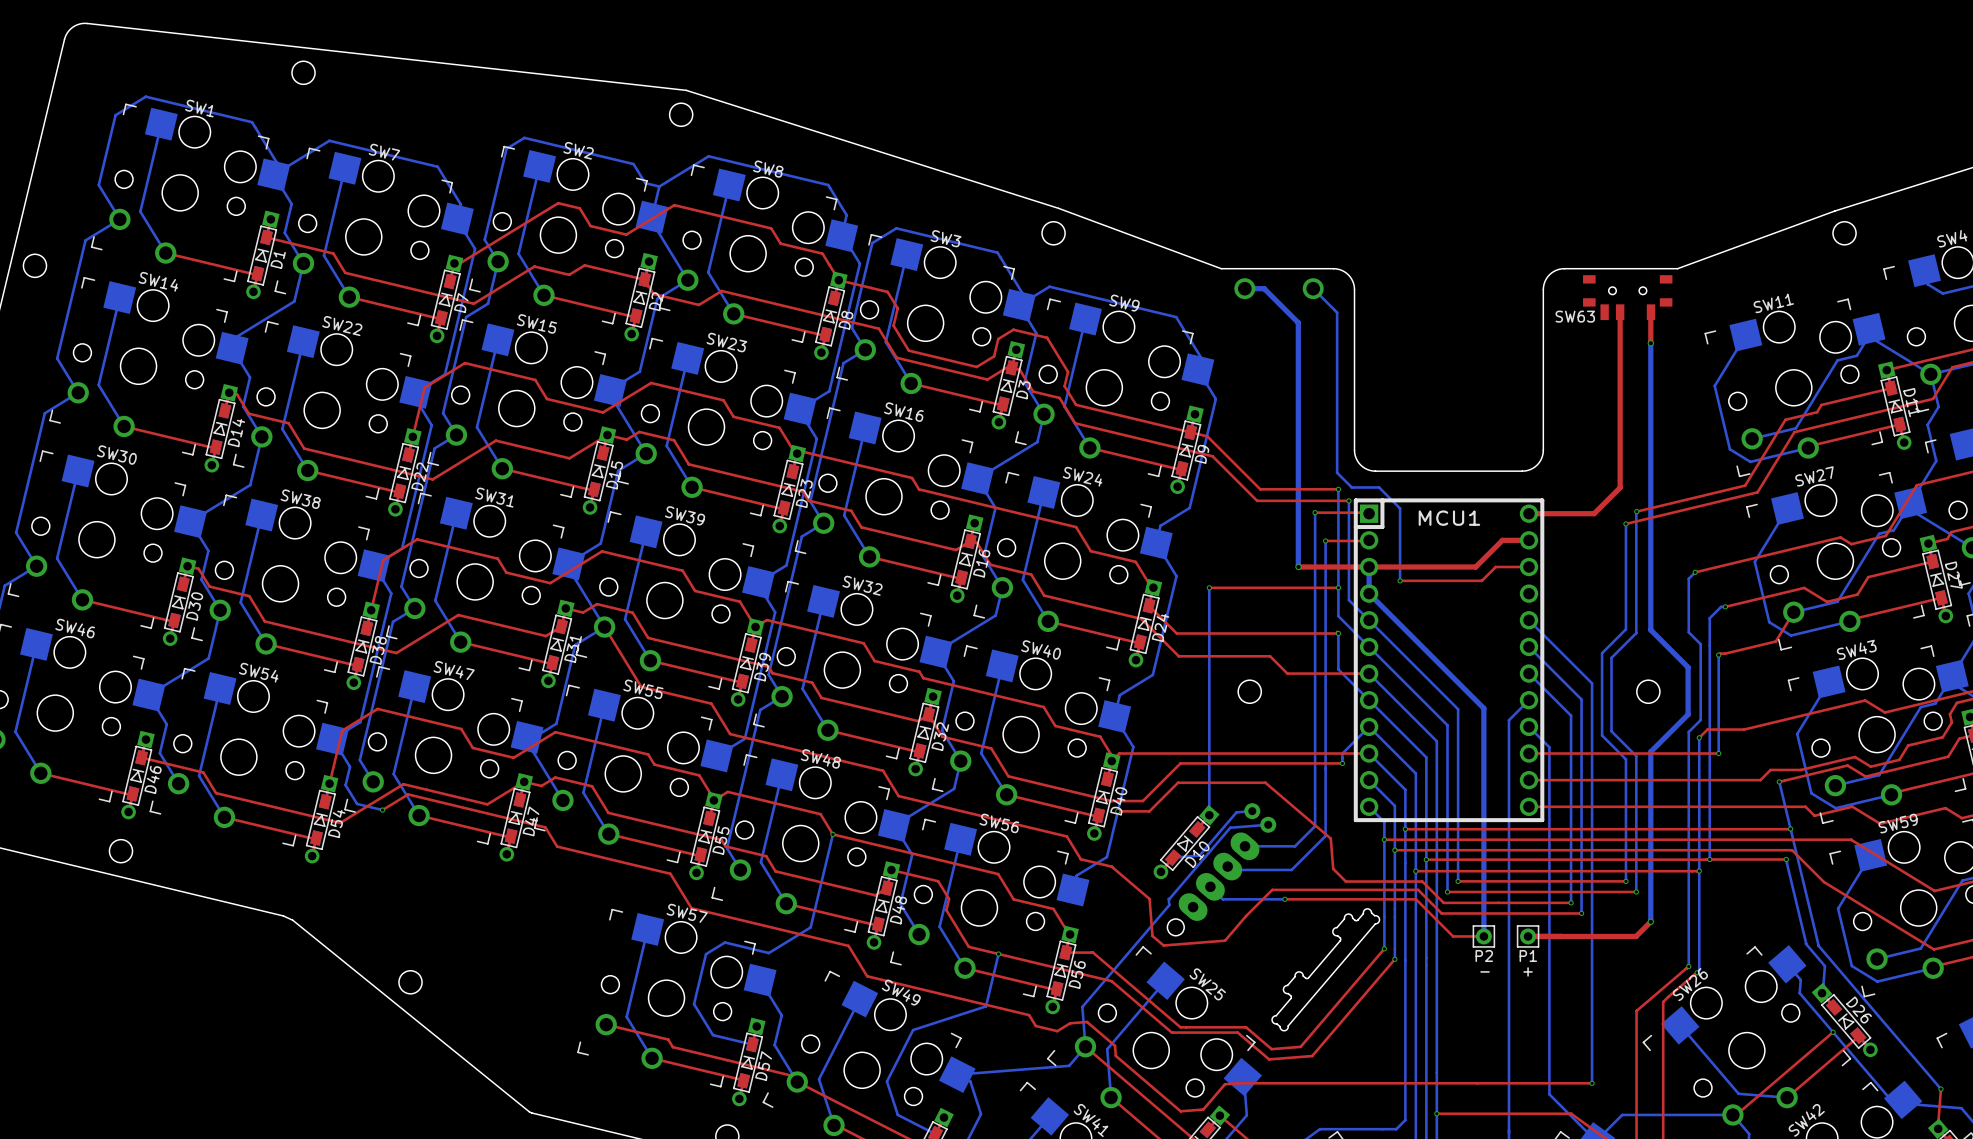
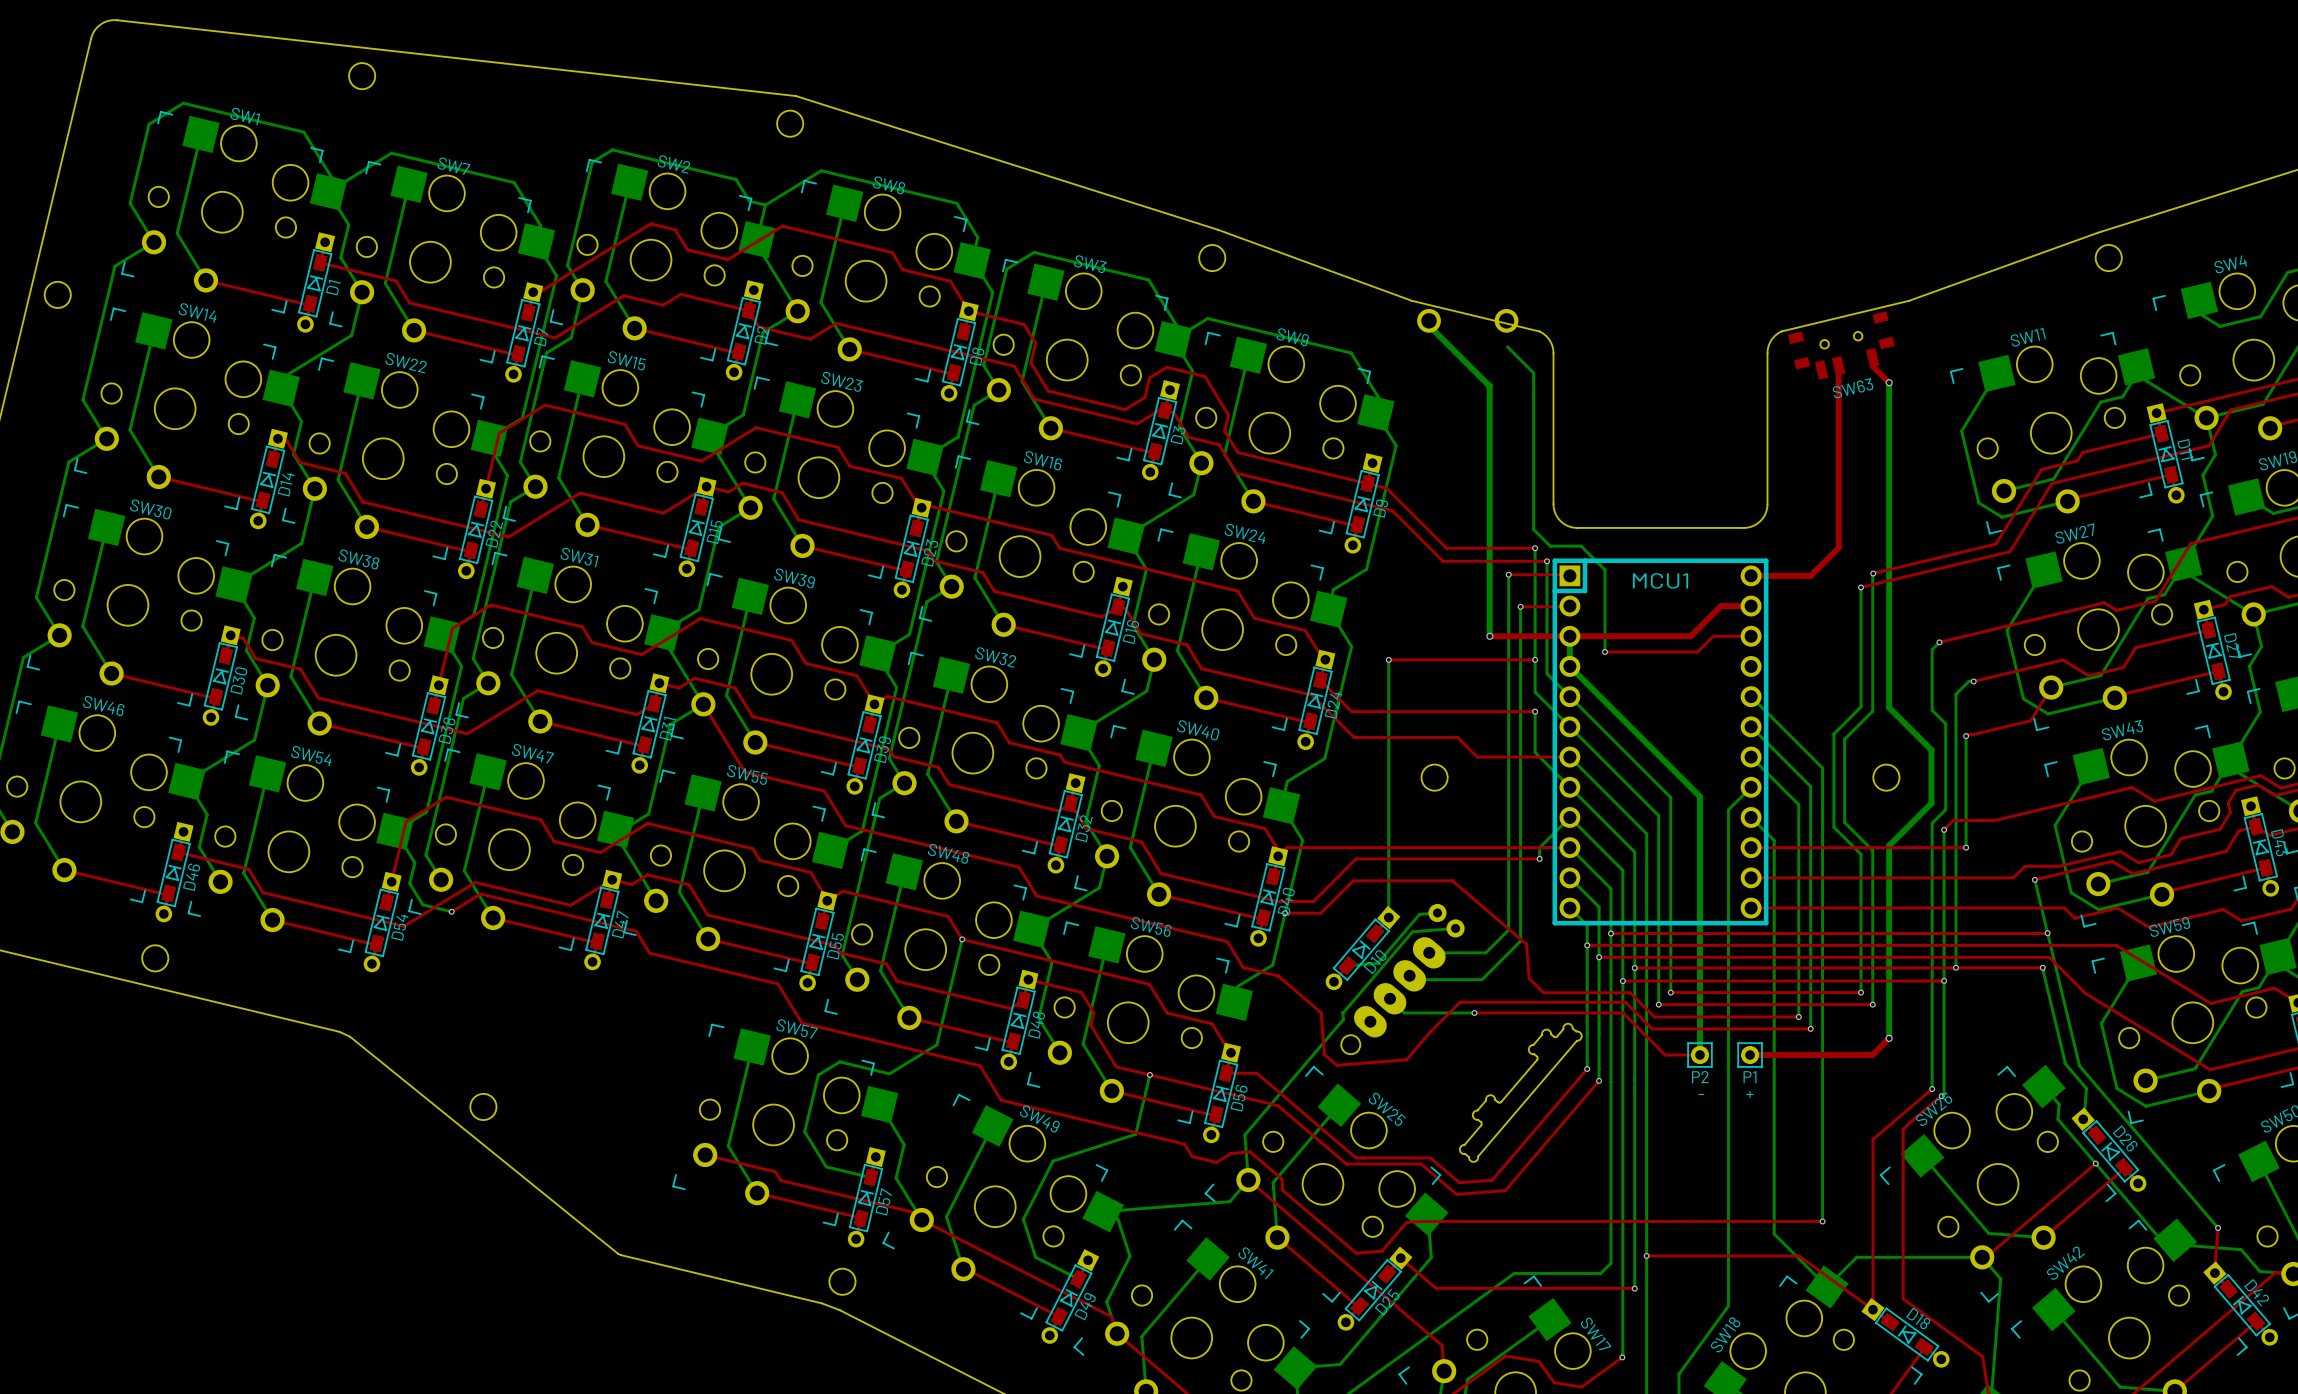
board edge: (1058, 208) (1221, 268) (1333, 268) (1346, 273) (1351, 279) (1354, 289) (1354, 452) (1357, 460) (1362, 466) (1375, 471) (1522, 471) (1530, 469) (1537, 465) (1541, 458) (1543, 450) (1543, 286) (1547, 276) (1553, 271) (1564, 268) (1677, 268) (1834, 211) -> (1218, 229) (1412, 300) (1539, 331) (1544, 334) (1551, 342) (1553, 353) (1553, 507) (1556, 516) (1562, 523) (1577, 527) (1743, 527) (1755, 524) (1762, 518) (1767, 507) (1767, 353) (1769, 342) (1776, 334) (1781, 331) (1909, 300) (2097, 232)
bottom track: (1244, 288) (1264, 288) (1298, 322) (1298, 345) -> (1432, 328) (1489, 385)
bottom track: (1313, 288) (1337, 312) (1337, 334) -> (1507, 346) (1533, 372)
SW63 rotation: 0° (1627, 297) -> 13.5° counterclockwise (1841, 345)
top track: (1620, 312) (1620, 487) (1594, 513) (1581, 513) -> (1838, 365) (1838, 547) (1810, 575)
top track: (1651, 312) (1650, 343) -> (1872, 357) (1872, 366) (1889, 382)
SW63 name position: SW63 (1575, 316) -> SW63 (1852, 388)

